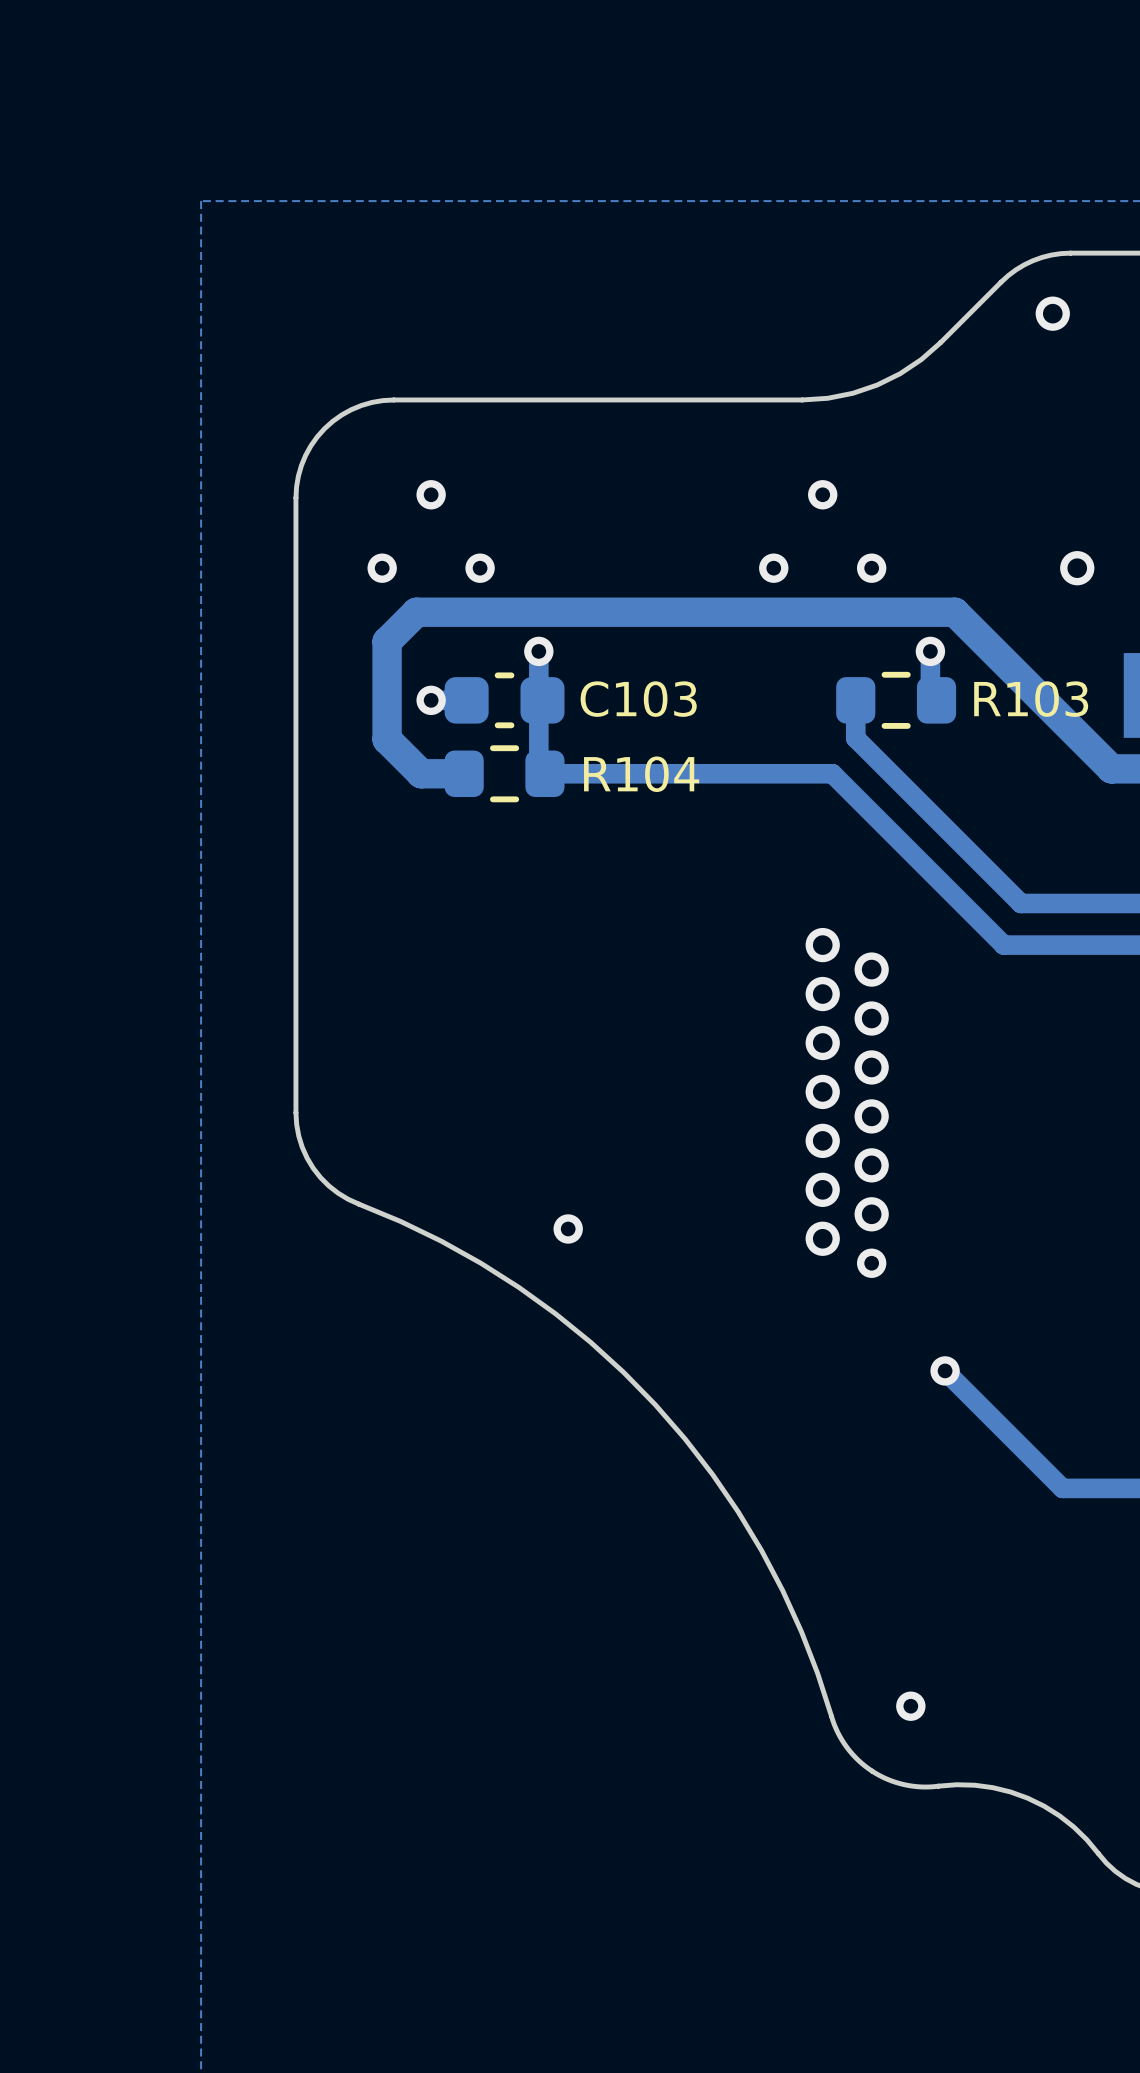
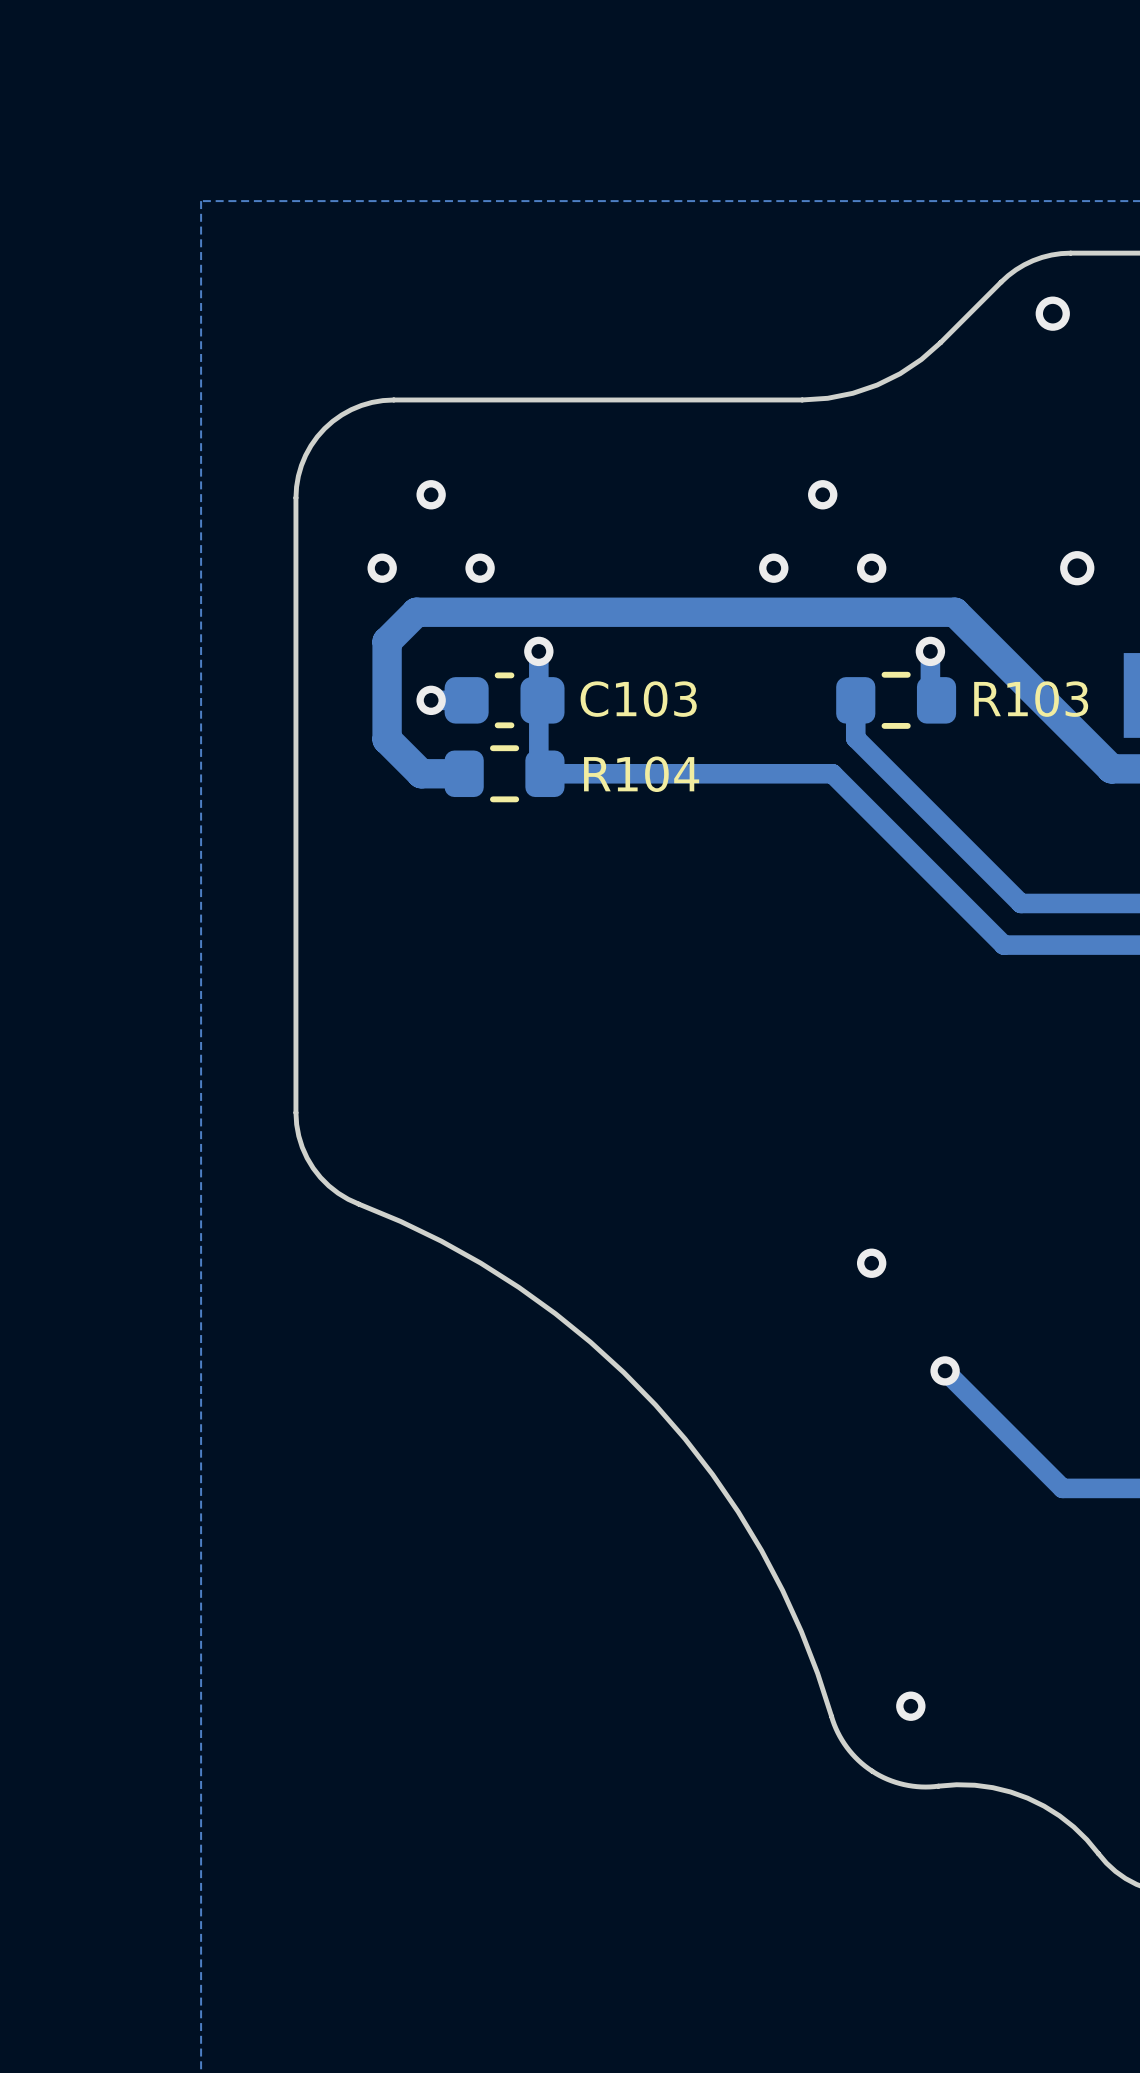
via: (822, 945) -> none
via: (871, 969) -> none
via: (822, 994) -> none
via: (871, 1018) -> none
via: (822, 1042) -> none
via: (871, 1067) -> none
via: (822, 1091) -> none
via: (871, 1116) -> none
via: (822, 1140) -> none
via: (871, 1165) -> none
via: (822, 1189) -> none
via: (871, 1214) -> none
via: (568, 1228) -> none
via: (822, 1238) -> none

